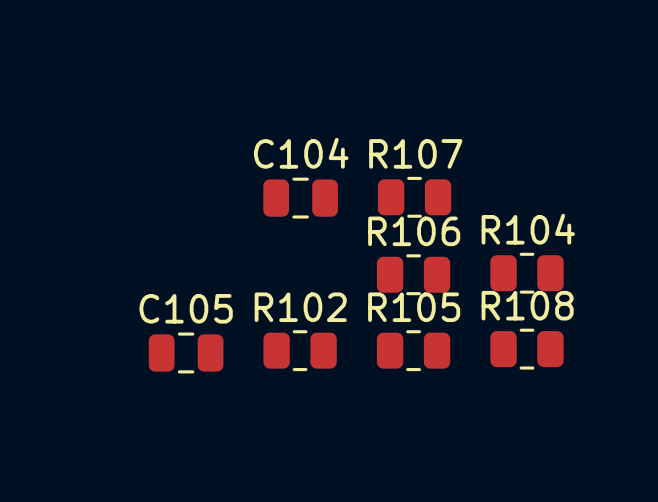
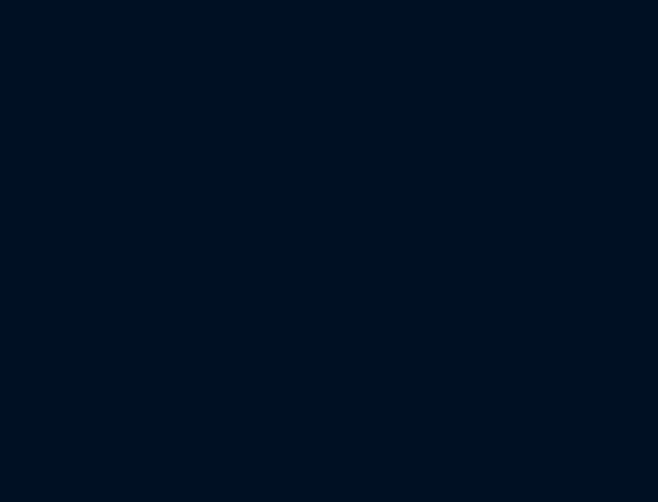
R107: (414, 197) -> none
C104: (300, 198) -> none
R104: (527, 273) -> none
R106: (413, 274) -> none
R108: (527, 349) -> none
R102: (300, 350) -> none
R105: (413, 350) -> none
C105: (186, 352) -> none

